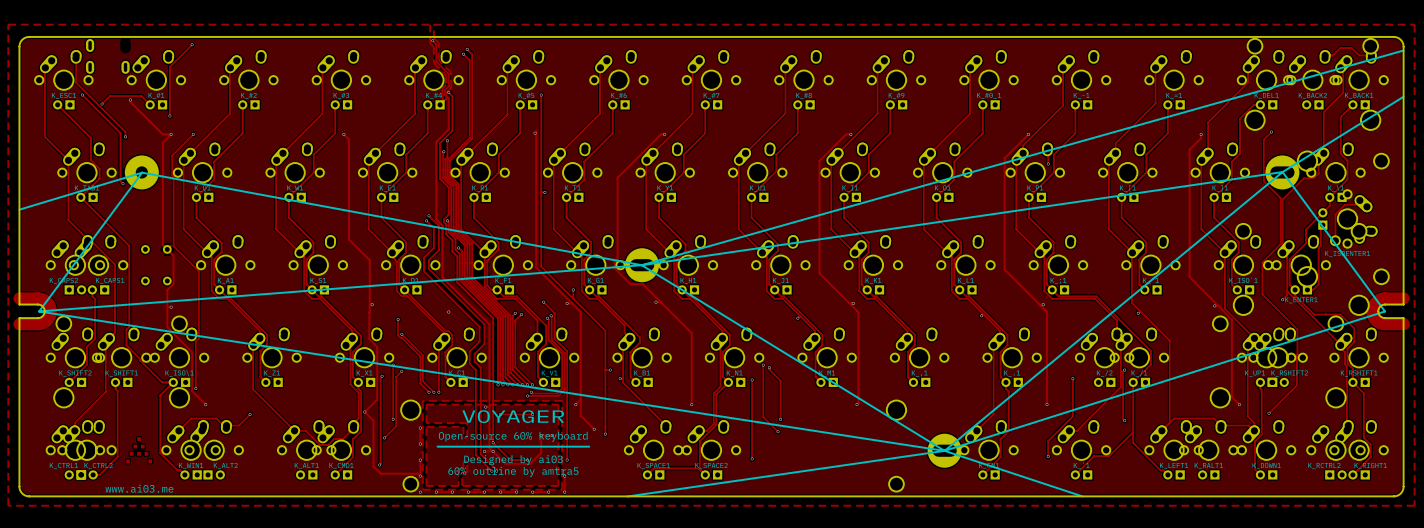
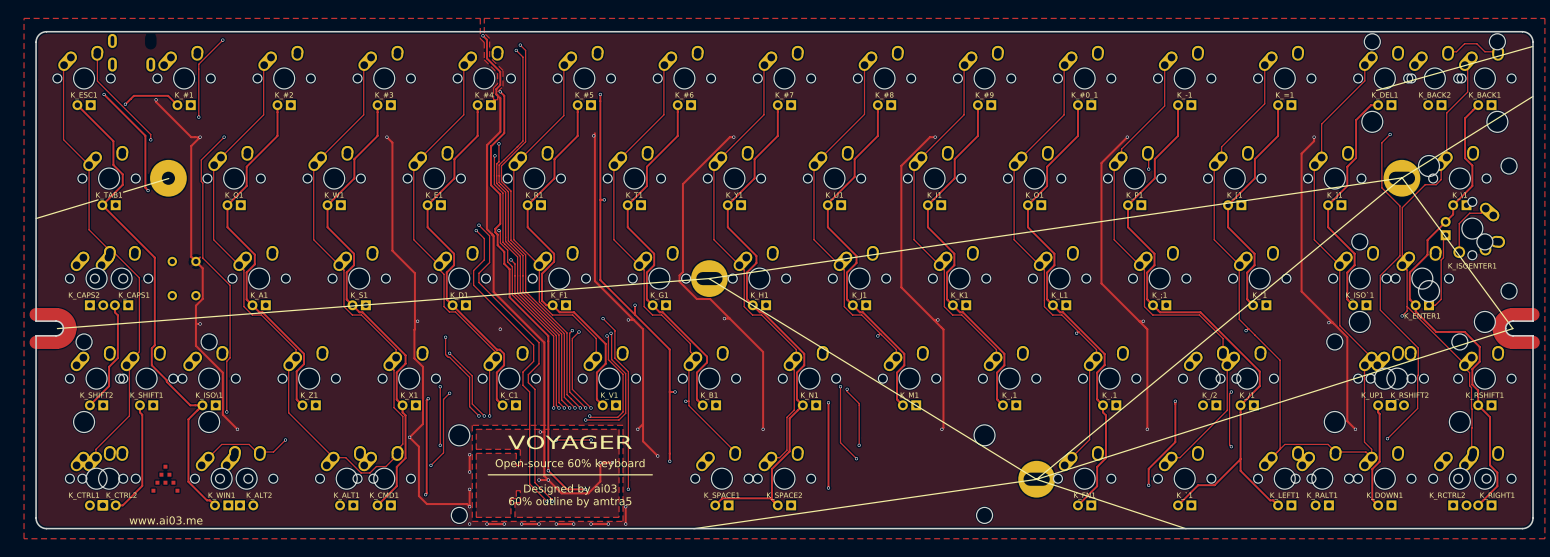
line: (1403, 50) (641, 265) (142, 172) (39, 311) (944, 450) -> (1532, 46) (1376, 90)
line: (100, 185) (19, 209) -> (98, 199) (36, 218)

